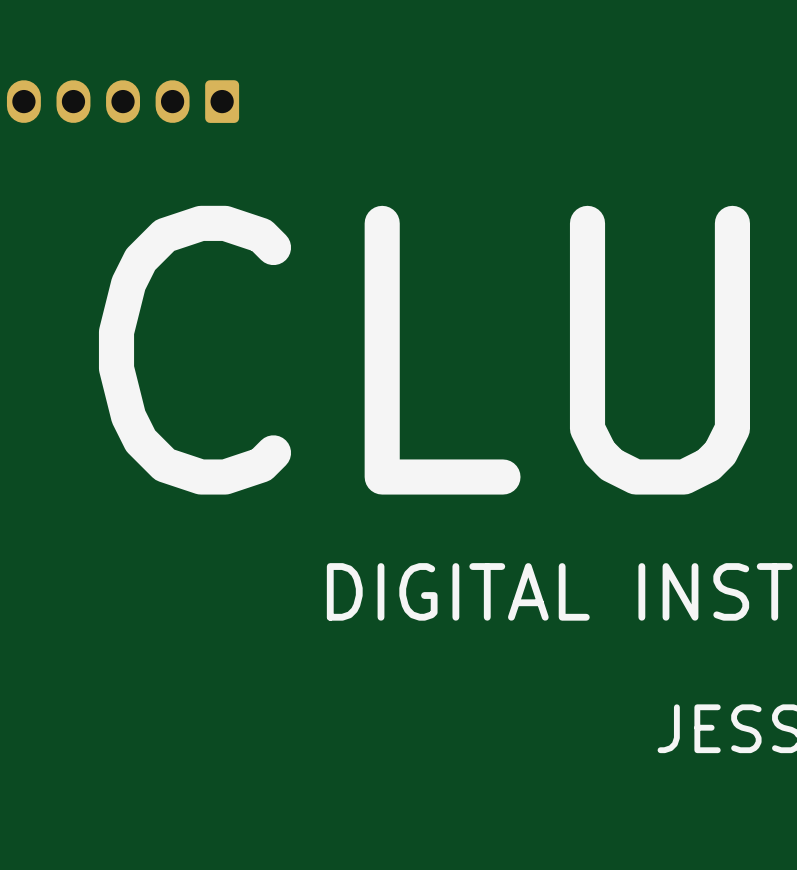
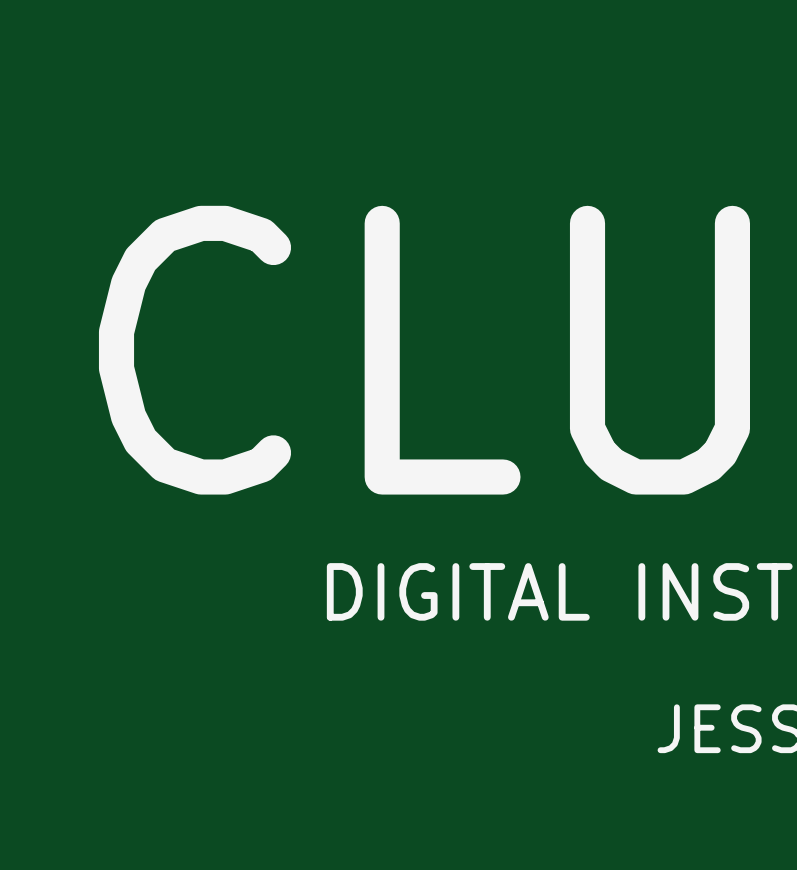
part: (123, 101) -> none

